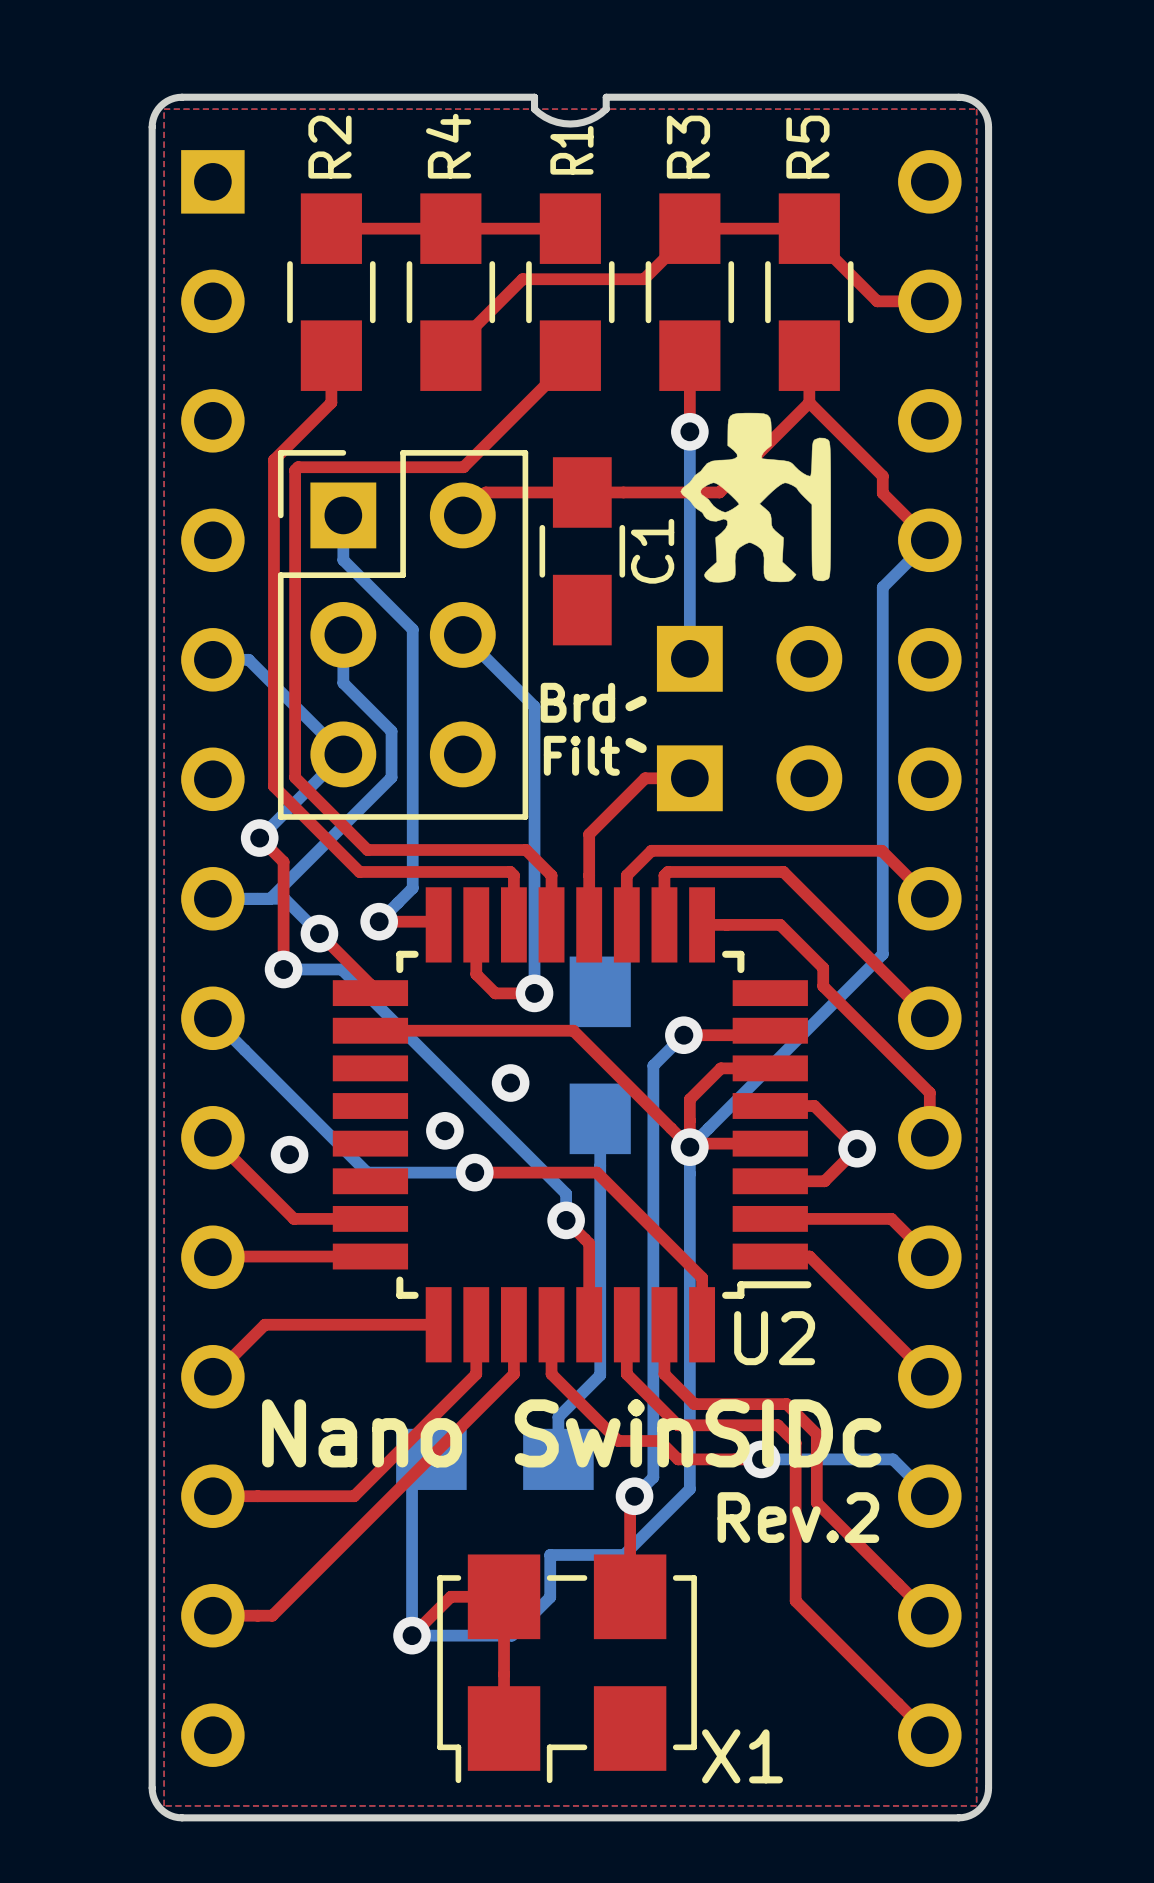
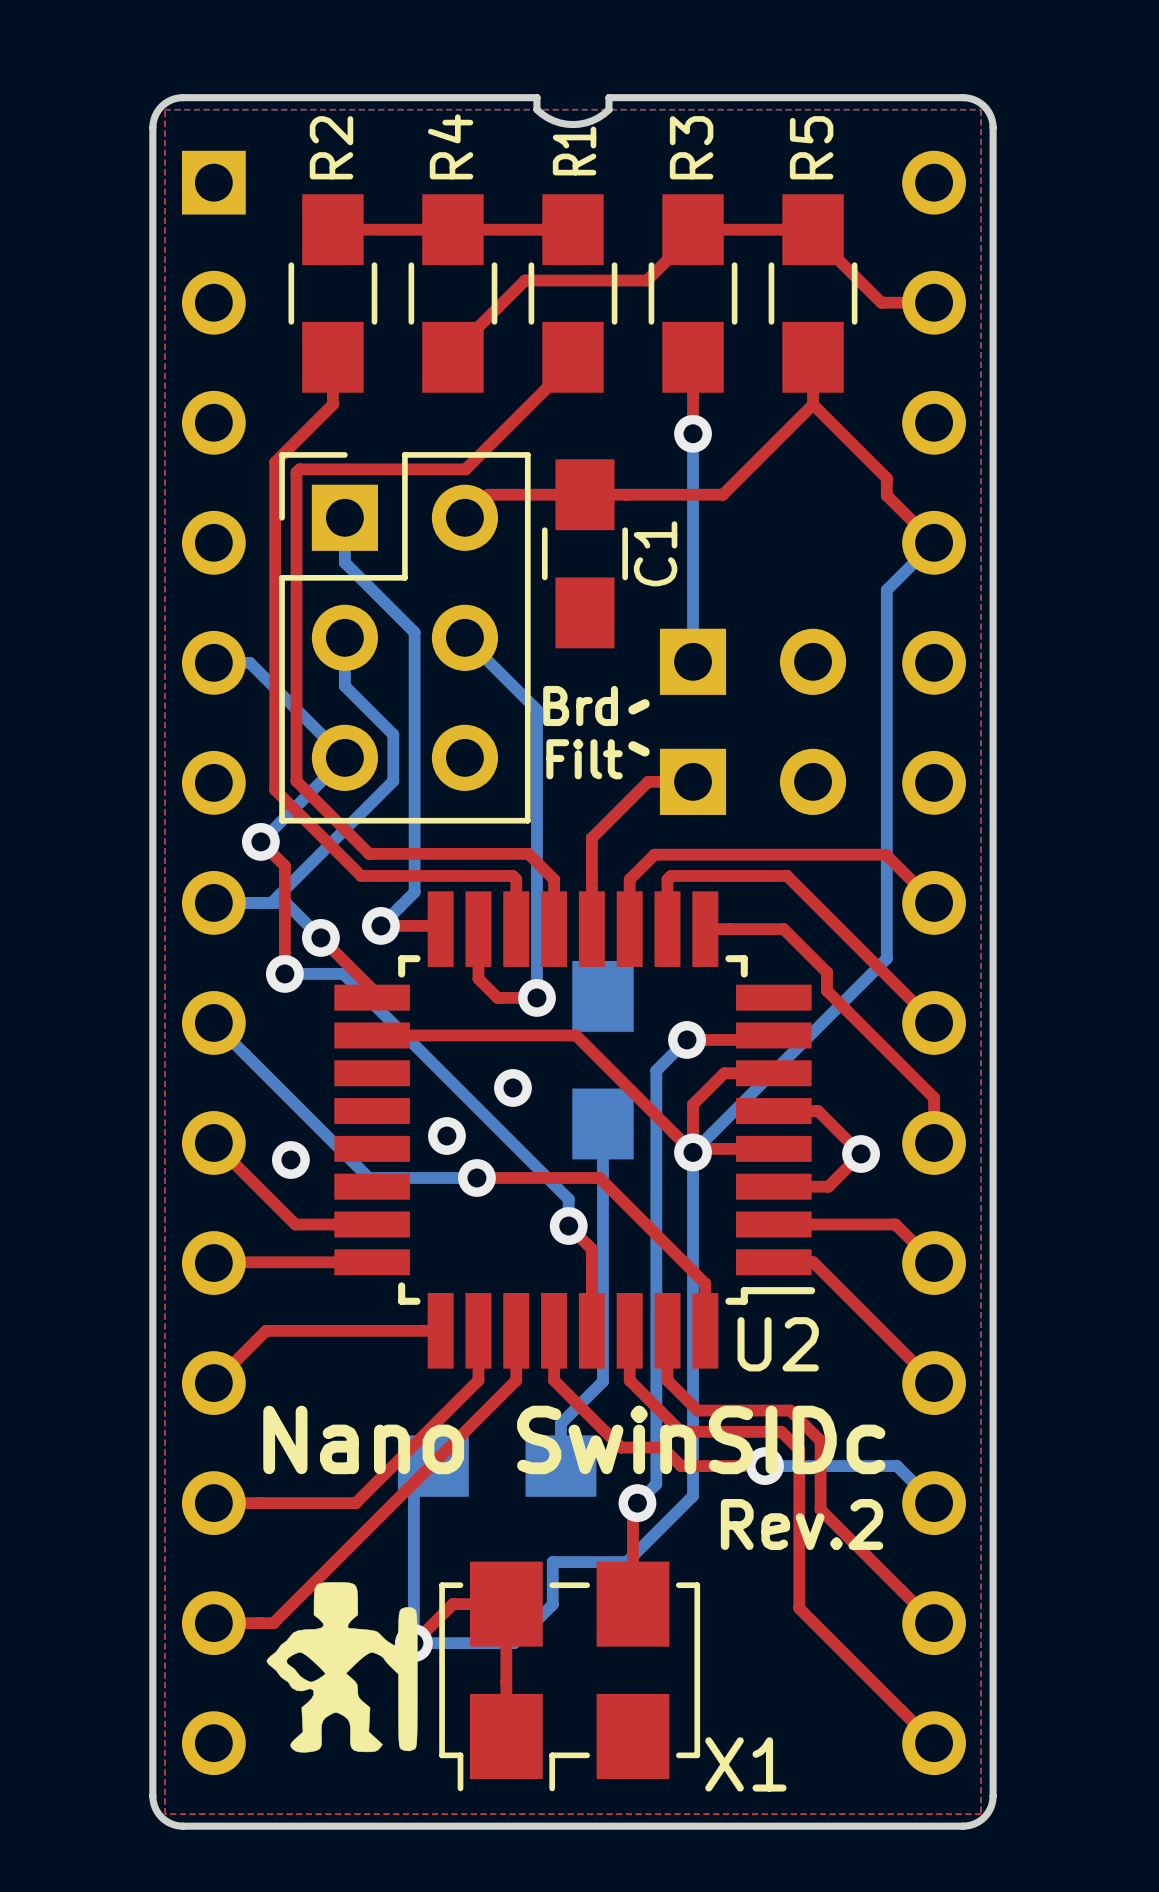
drawing: [680, 412, 831, 583] -> none
drawing: none -> [266, 1582, 418, 1753]

